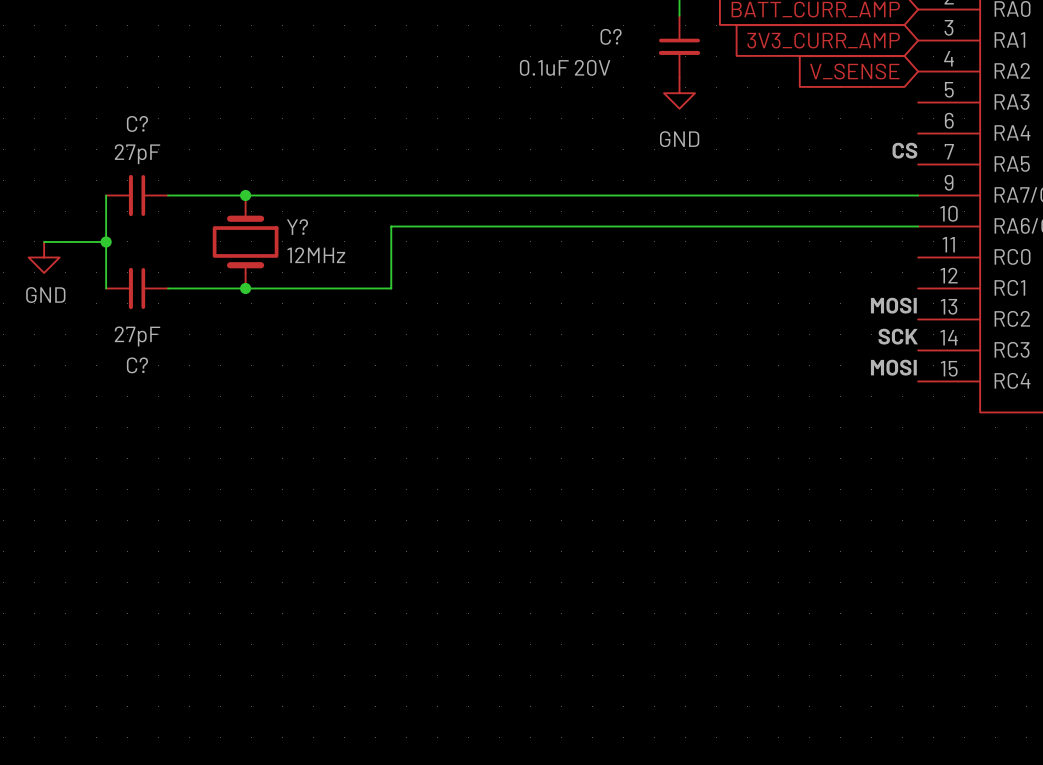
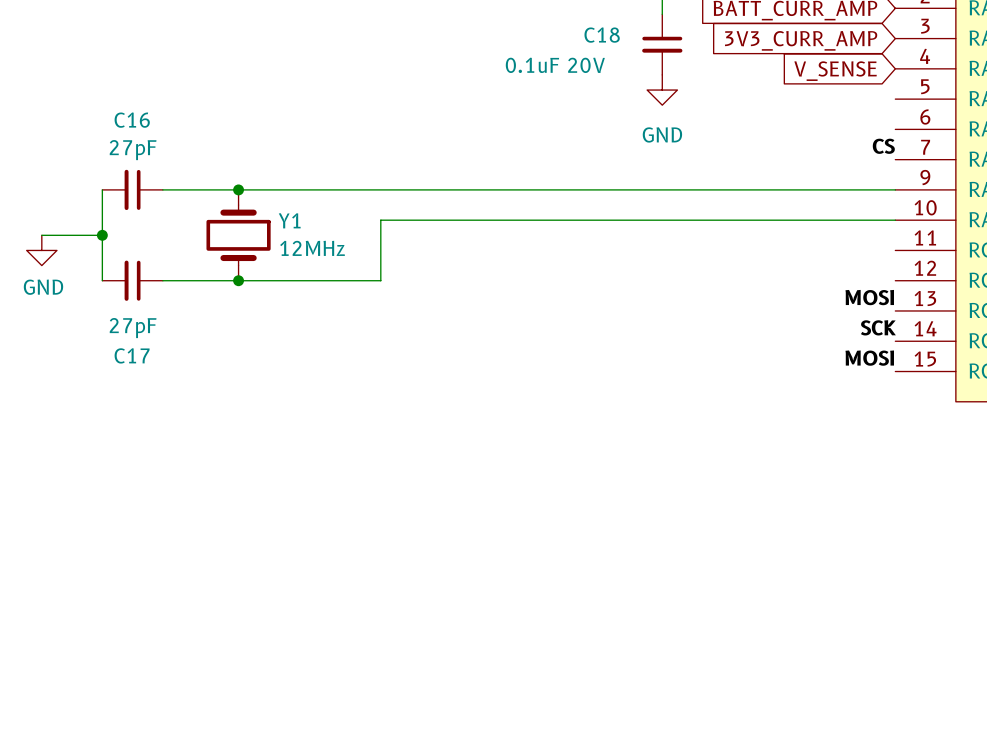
C? name: C? (611, 36) -> C18 (602, 35)
C? name: C? (137, 123) -> C16 (132, 120)
Y? name: Y? (297, 227) -> Y1 (289, 220)
C? name: C? (137, 365) -> C17 (132, 355)

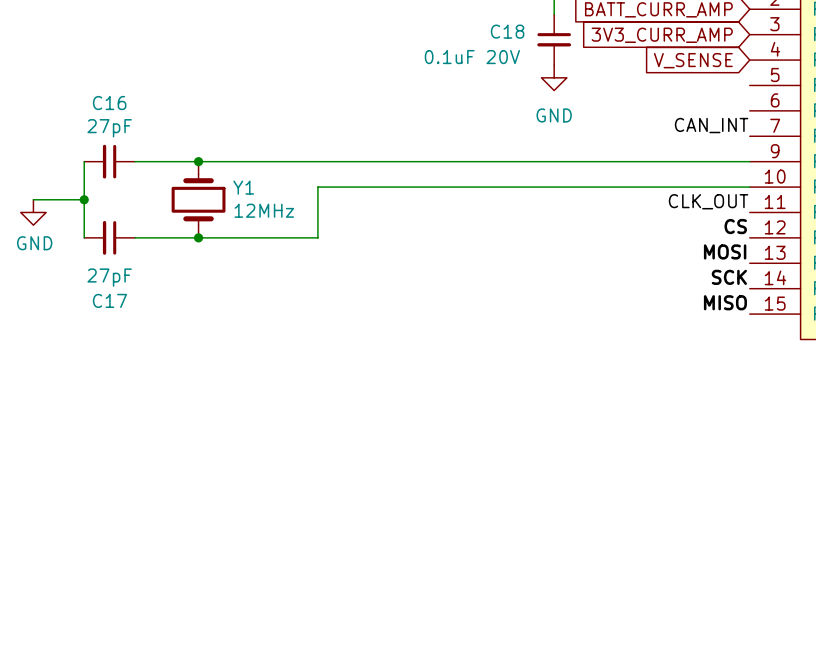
label: CS (883, 146) -> CAN_INT (711, 125)
label: none -> CLK_OUT (708, 201)
label: none -> CS (735, 226)
label: MOSI (869, 358) -> MISO (725, 302)

